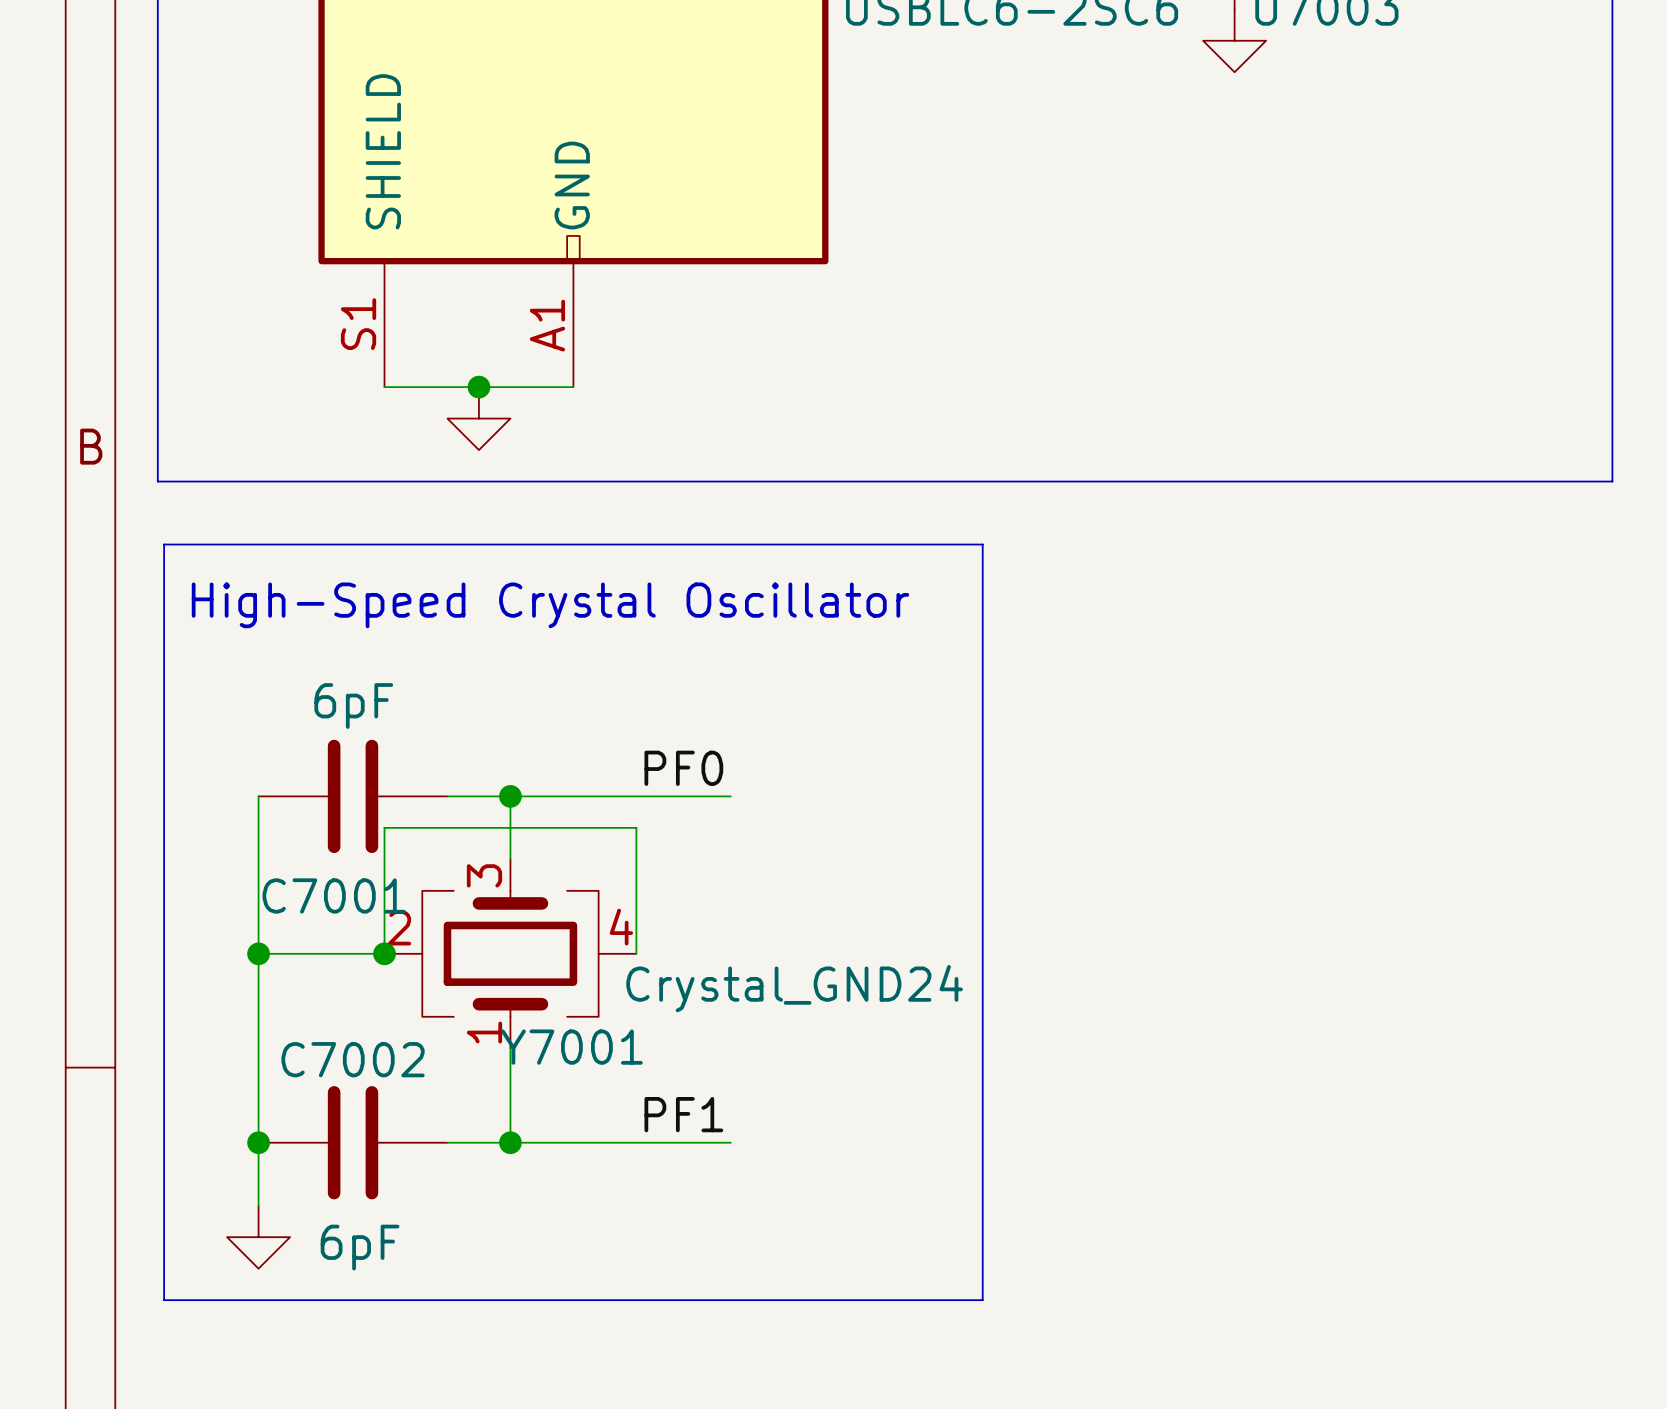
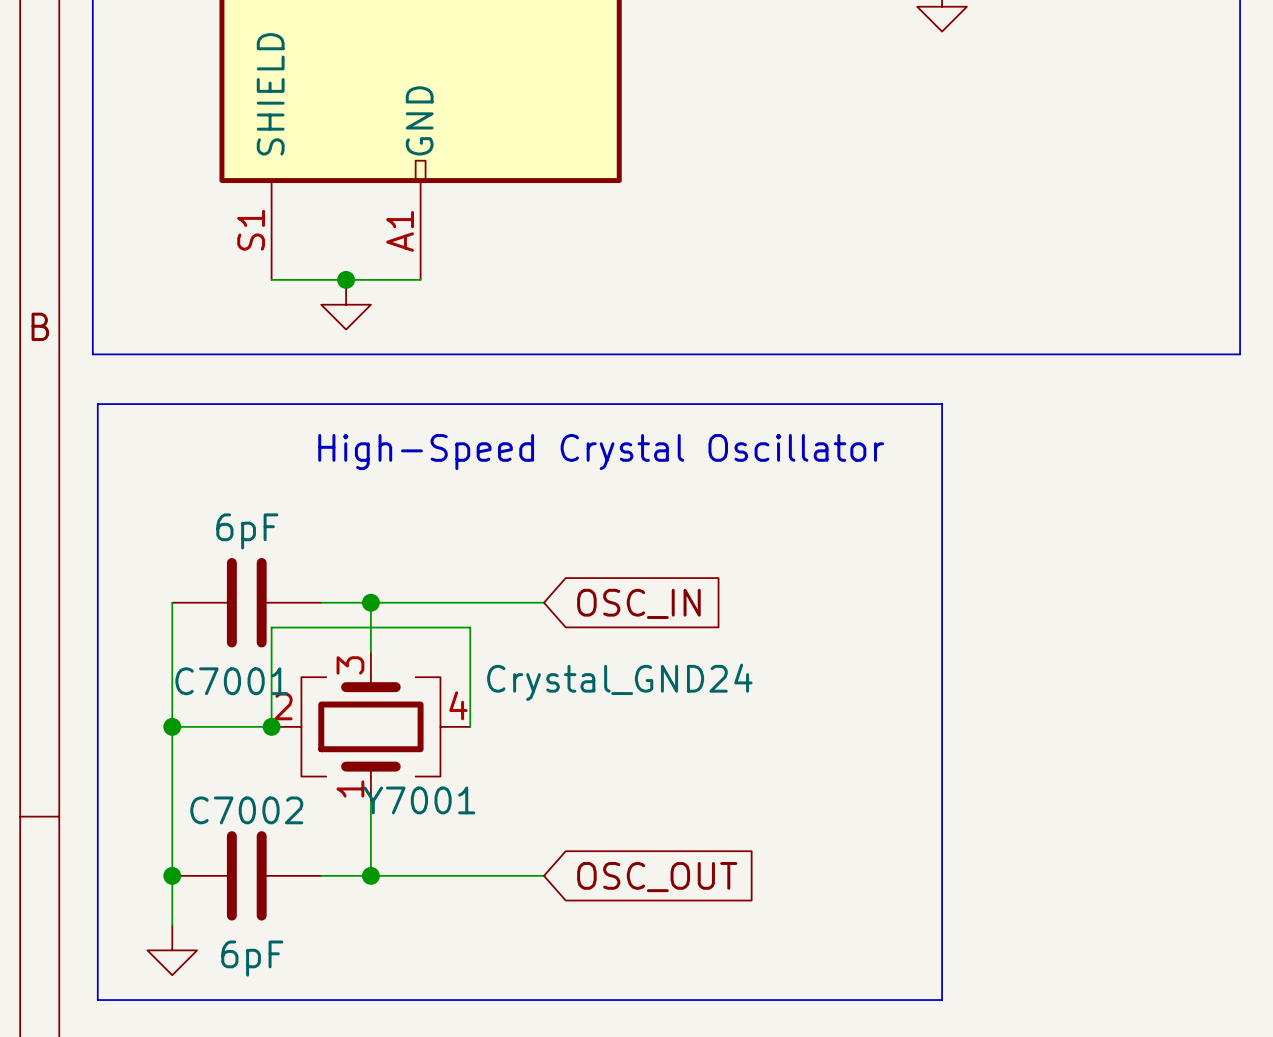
line: (982, 544) (982, 1300) -> (743, 404) (942, 404) (942, 1000) (743, 1000)
text position: High-Speed Crystal Oscillator (550, 605) -> High-Speed Crystal Oscillator (601, 452)
label: PF0 (683, 768) -> none
global label: none -> OSC_IN (638, 603)
Y7001 value position: Crystal_GND24 (794, 988) -> Crystal_GND24 (619, 682)
label: PF1 (683, 1114) -> none
global label: none -> OSC_OUT (657, 877)

